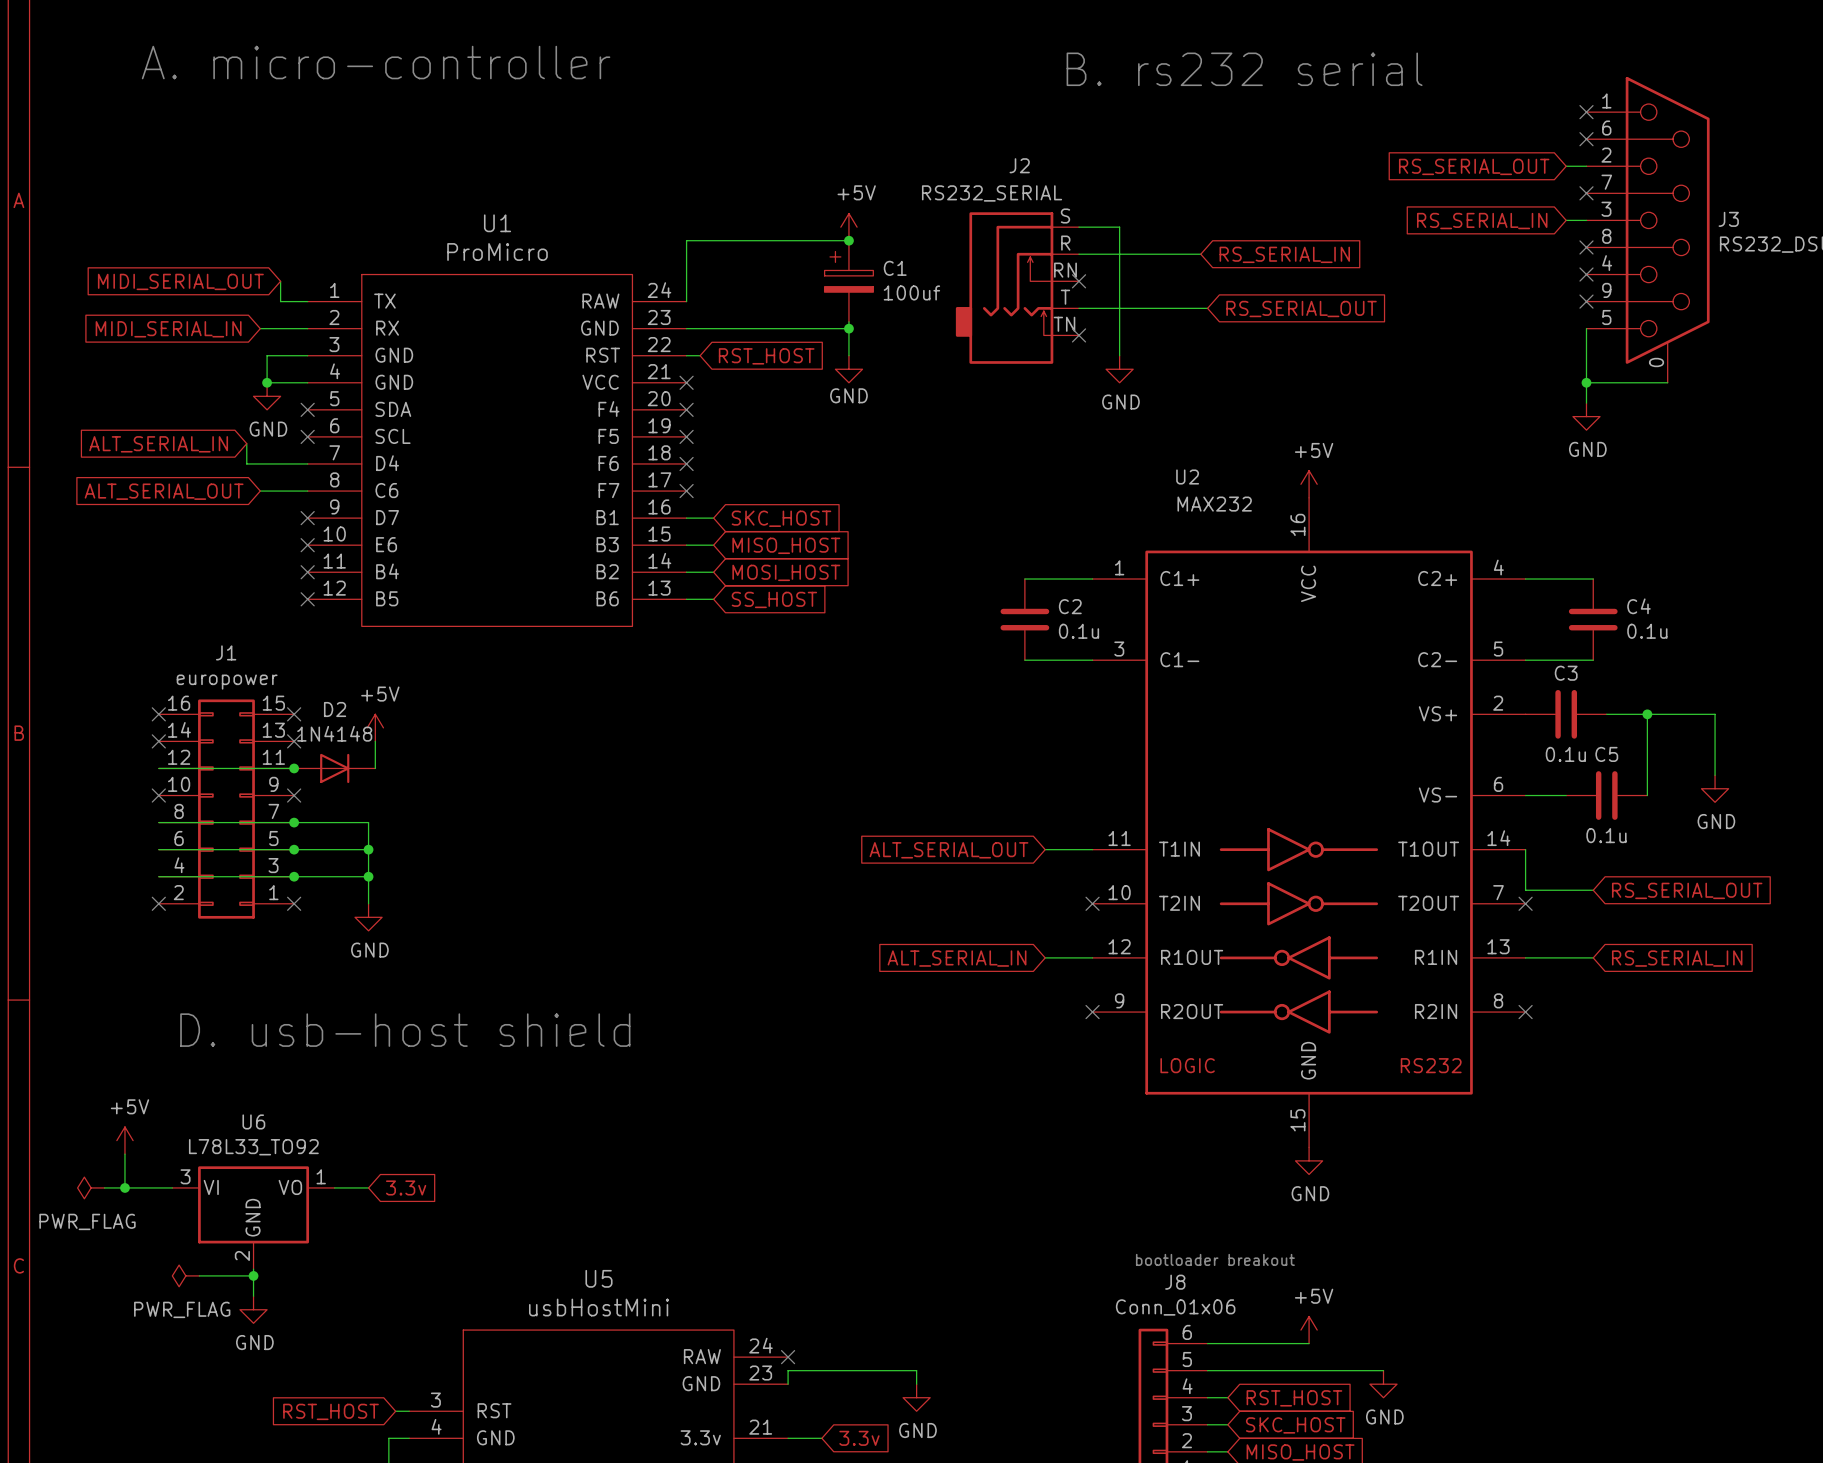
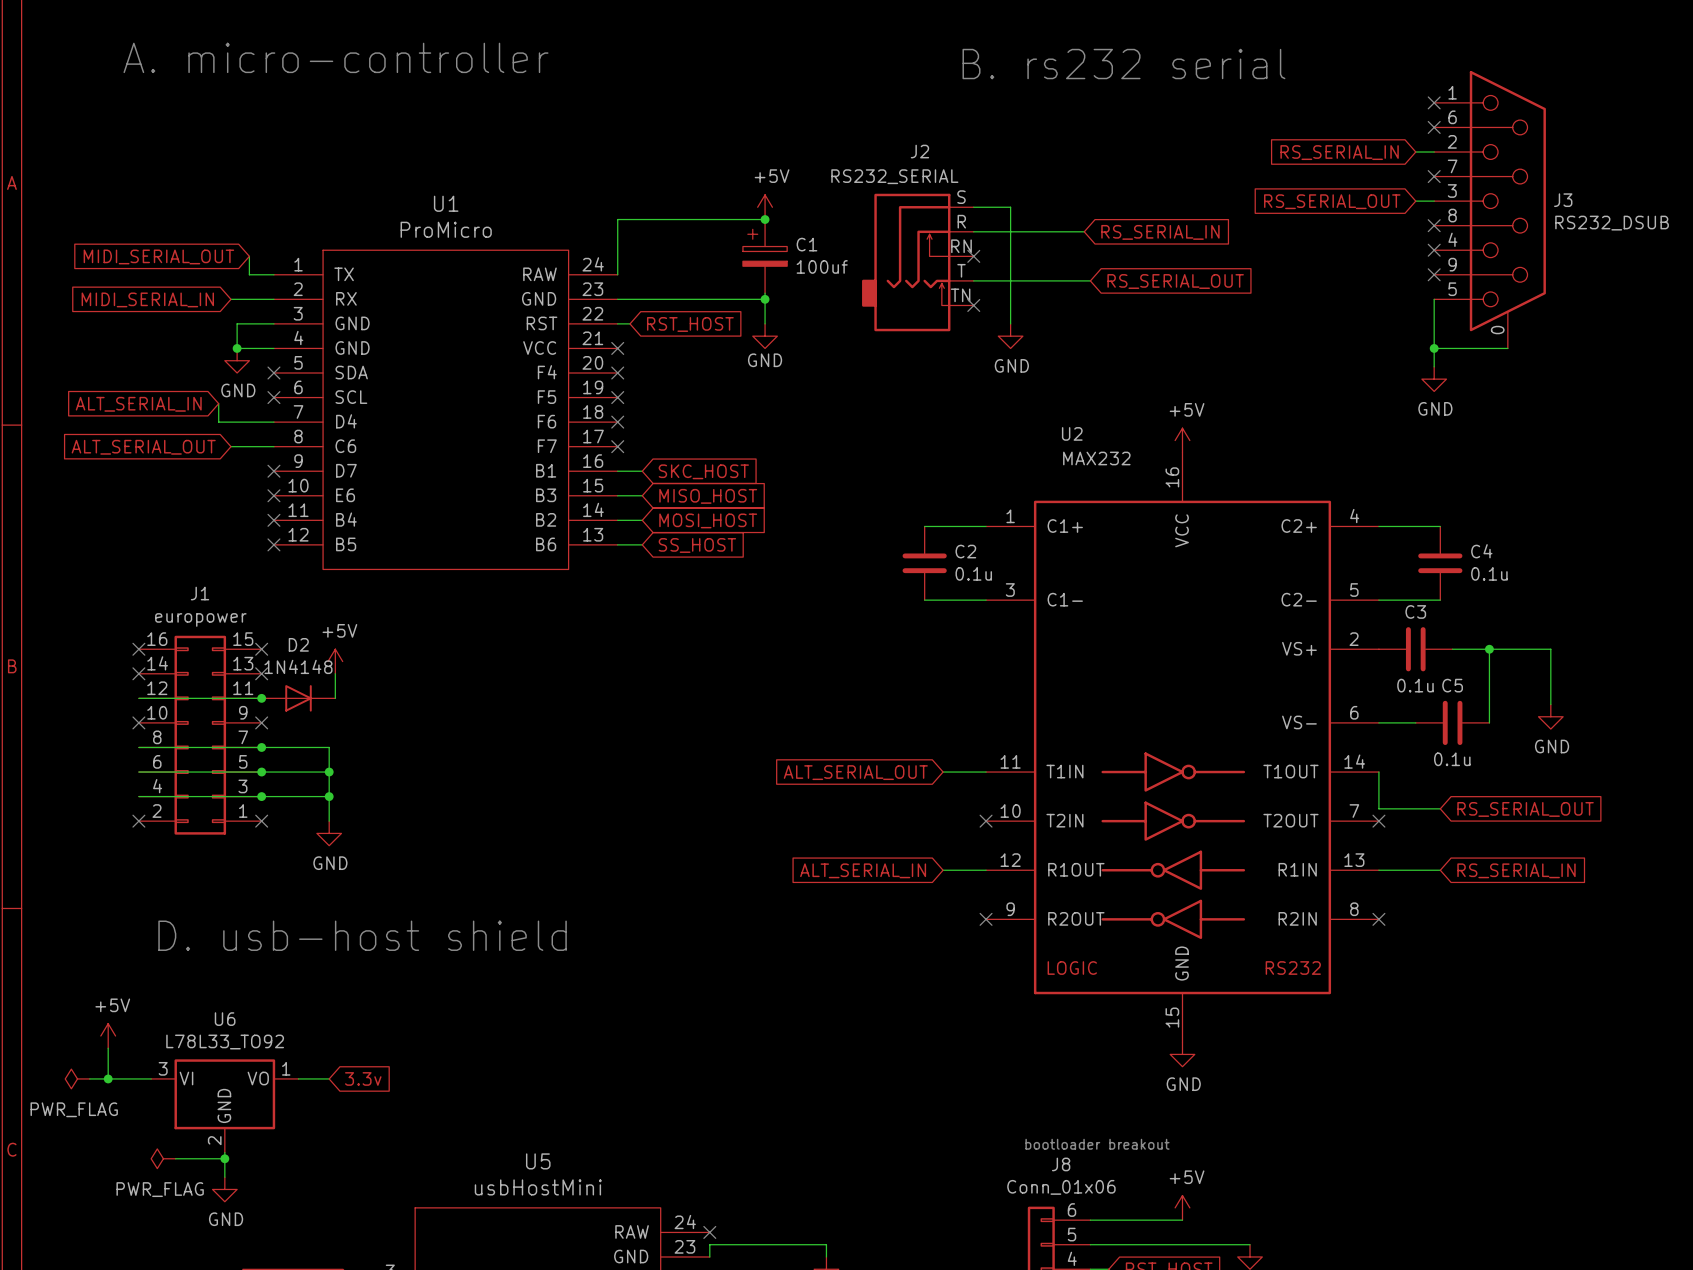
global label: RS_SERIAL_OUT (1474, 166) -> RS_SERIAL_IN (1339, 152)
global label: RS_SERIAL_IN (1482, 221) -> RS_SERIAL_OUT (1332, 201)

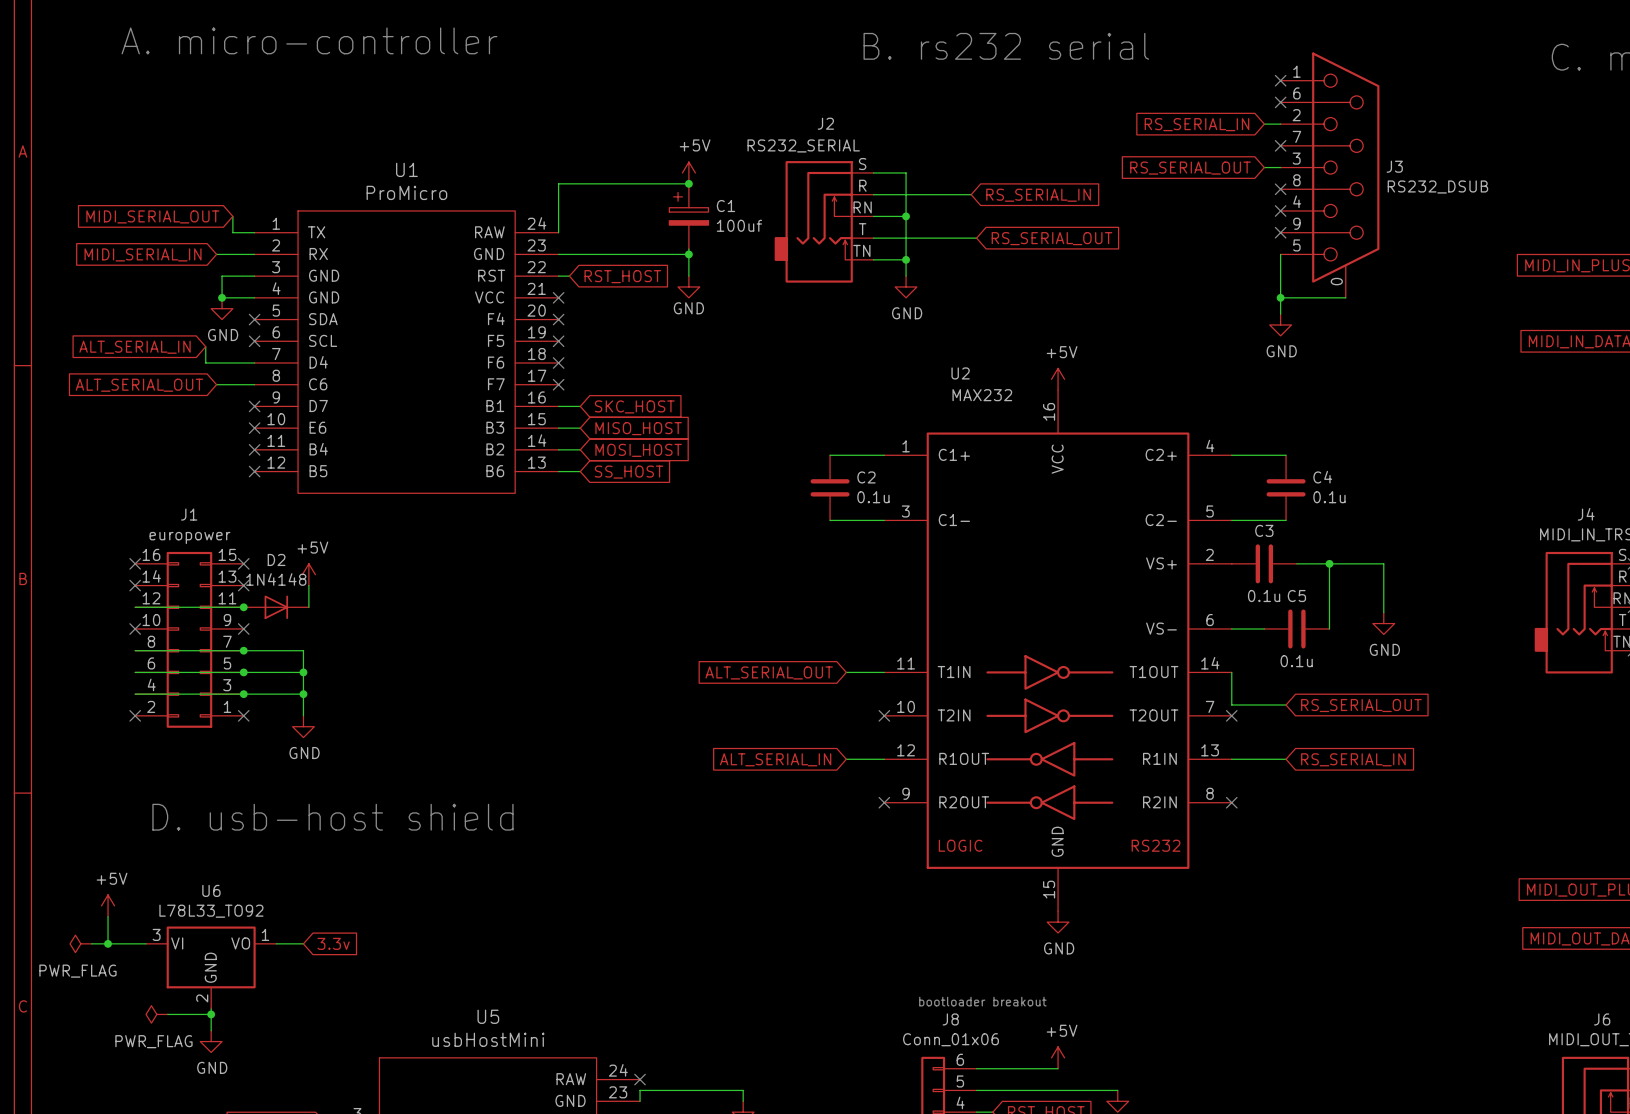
wire: none -> (873, 216) (906, 216)
no-connect mark: (973, 256) -> none
junction: none -> (906, 216)
wire: none -> (873, 259) (906, 259)
no-connect mark: (973, 305) -> none
junction: none -> (906, 259)

